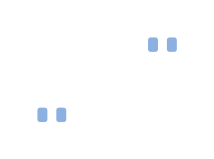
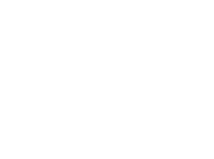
part: (162, 44) -> none
part: (51, 114) -> none

